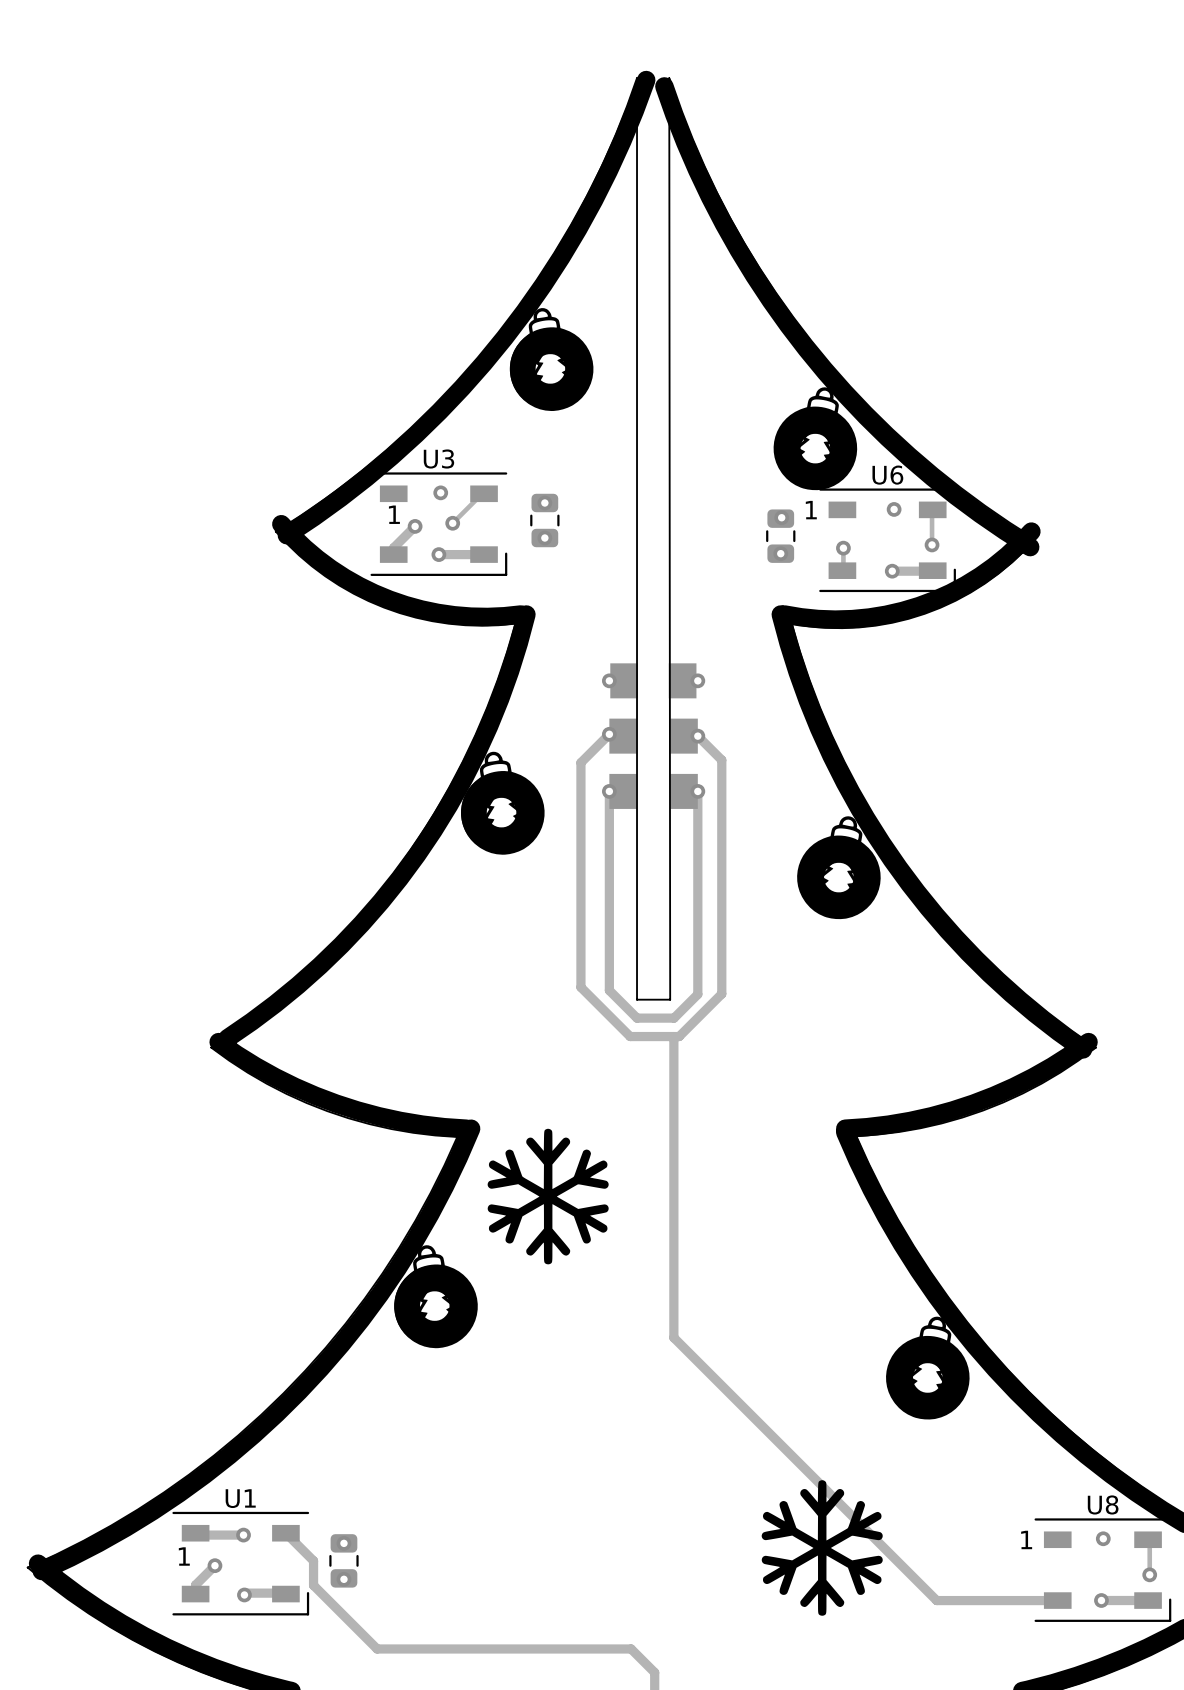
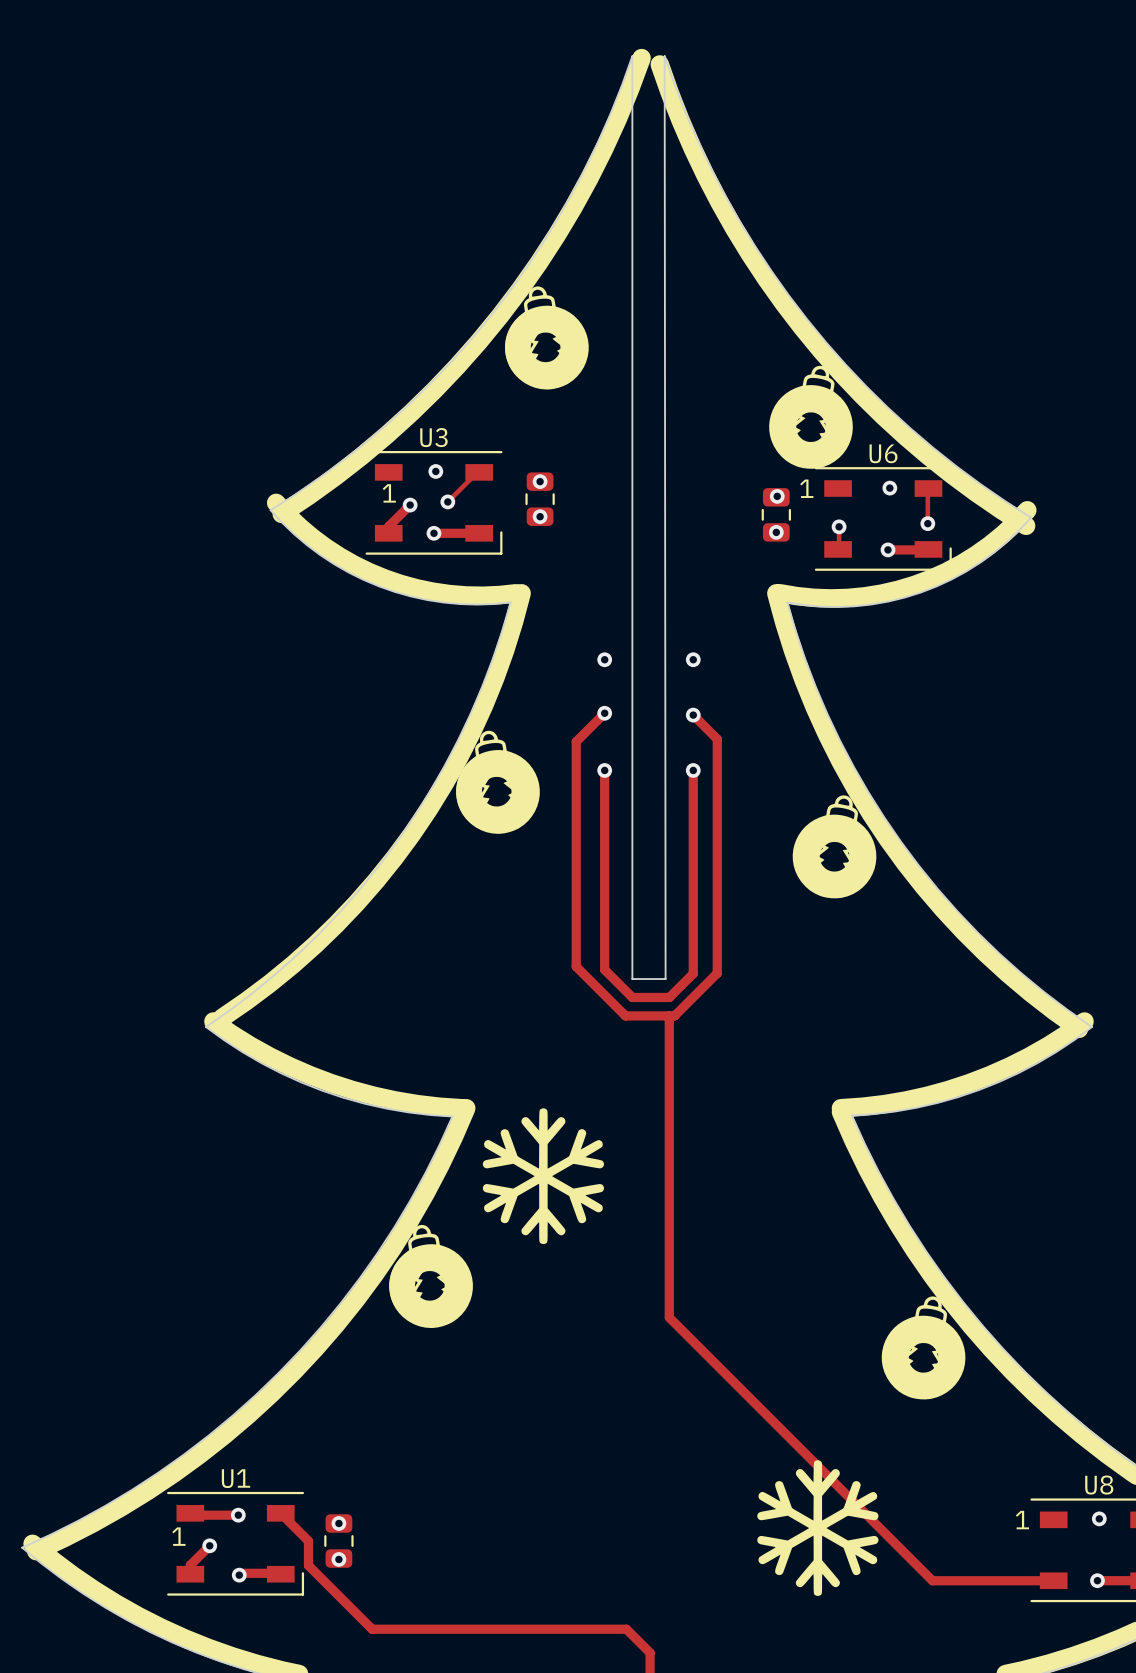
part: (624, 680) -> none
part: (682, 680) -> none
part: (623, 736) -> none
part: (684, 736) -> none
part: (623, 791) -> none
part: (684, 791) -> none

